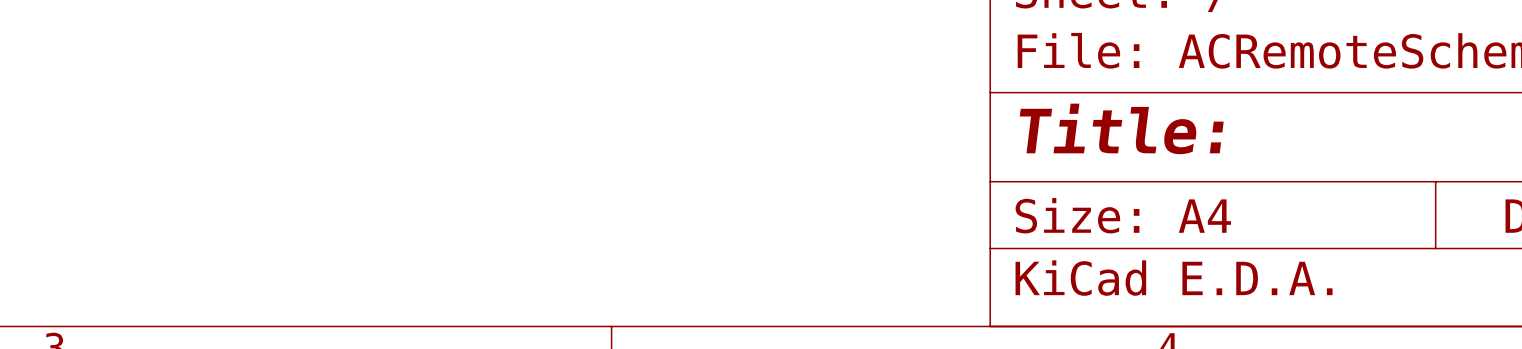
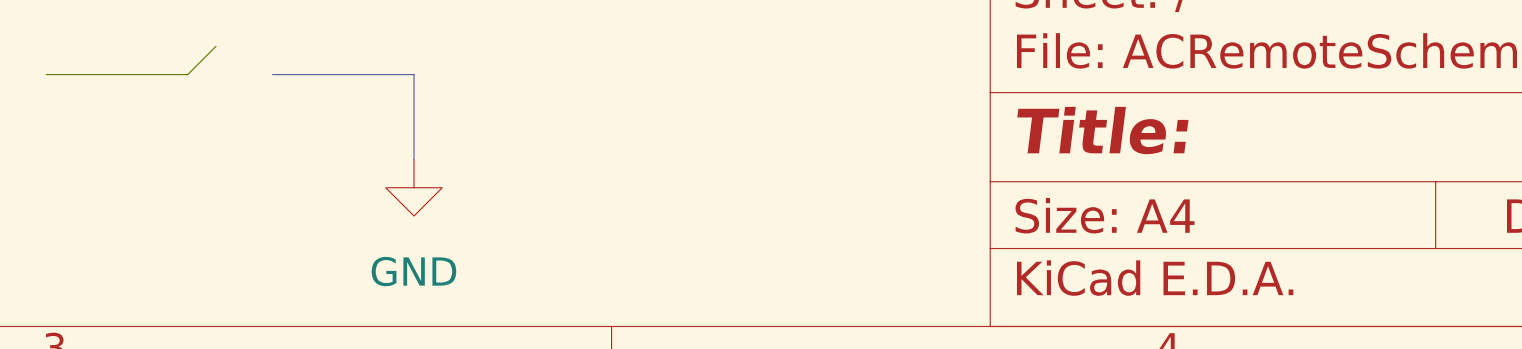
wire: none -> (216, 46) (187, 74) (46, 74)
bus: none -> (272, 74) (414, 74) (414, 159)
power symbol: none -> GND (414, 187)

